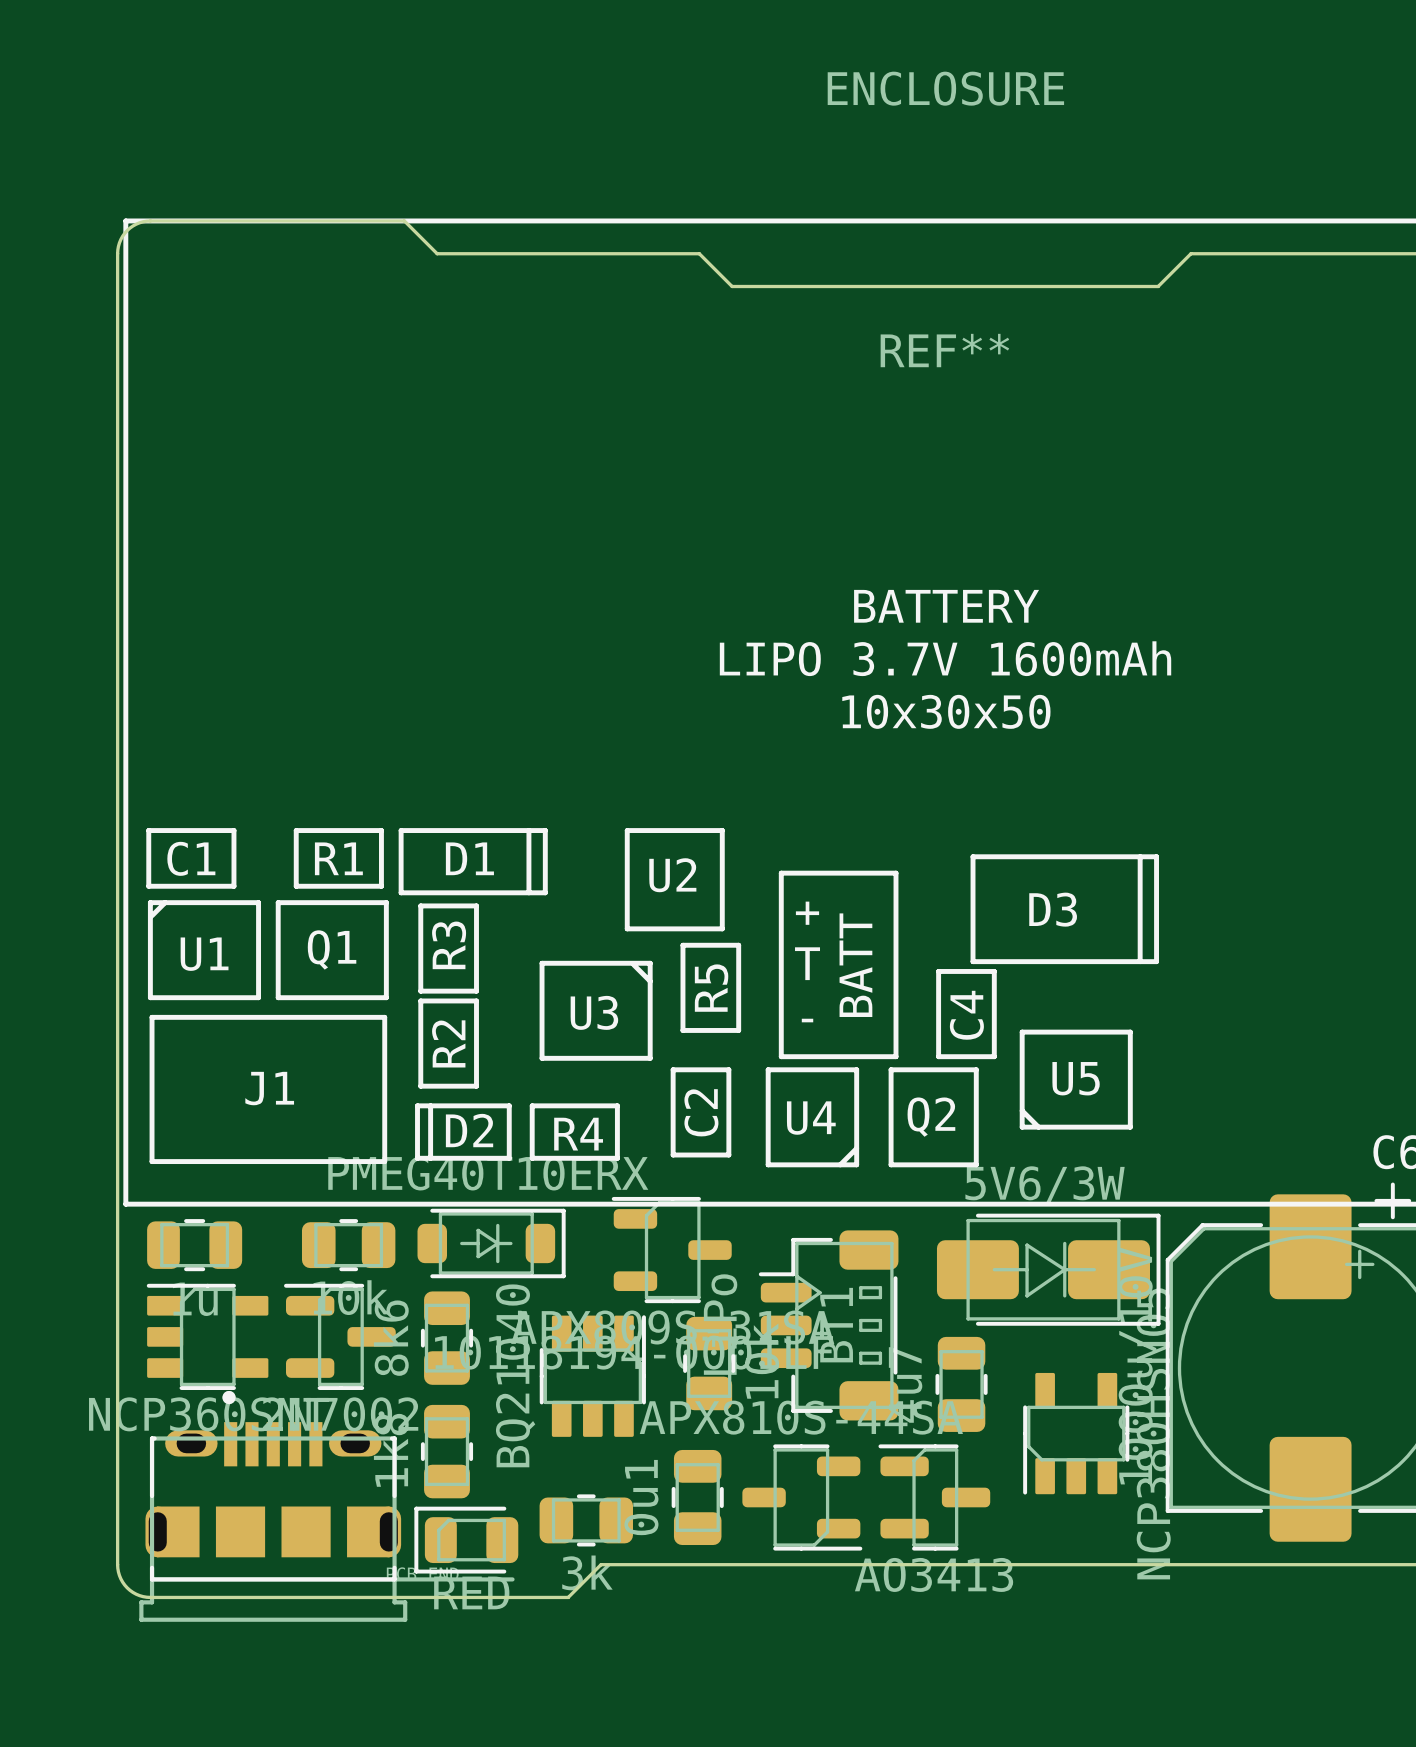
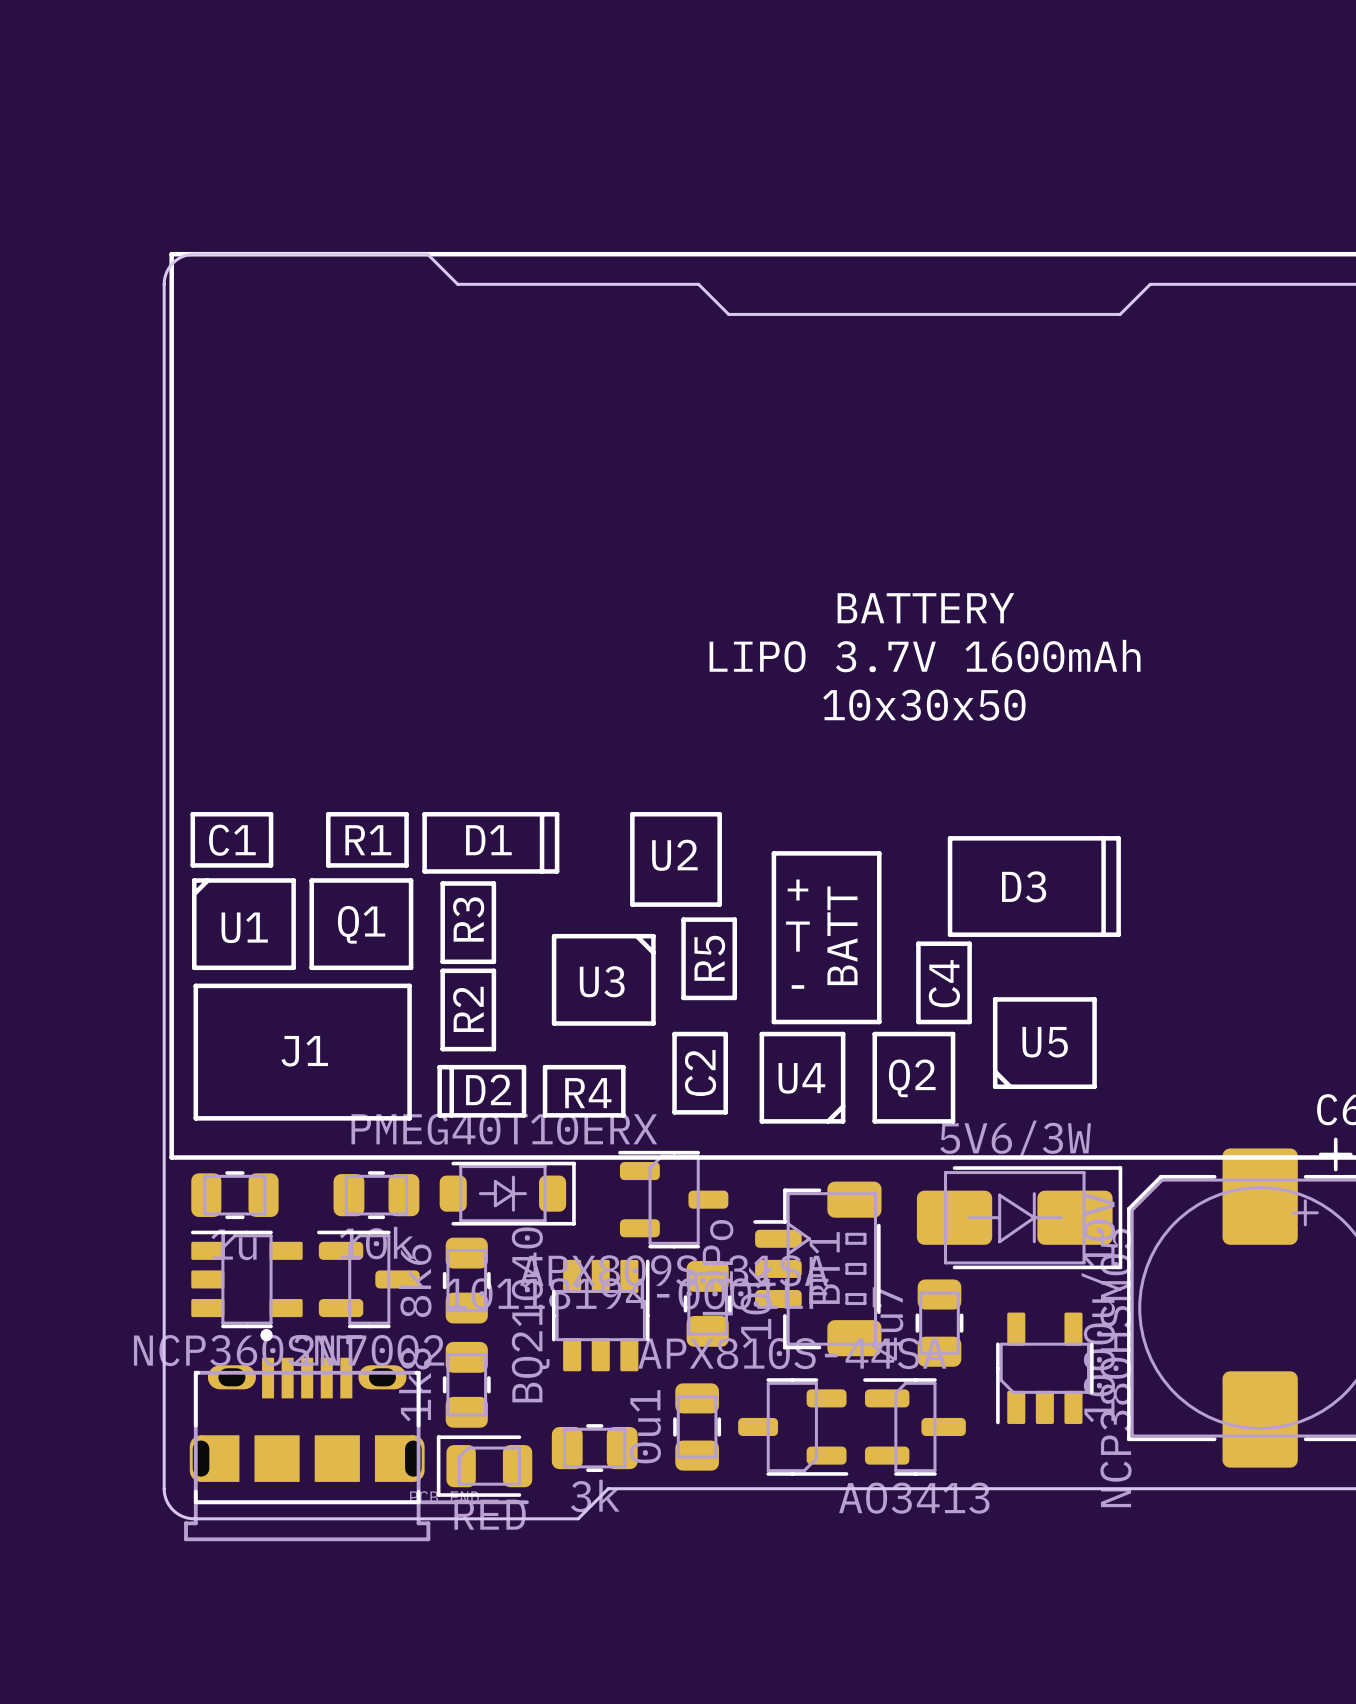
REF**: ENCLOSURE (945, 219) -> none

